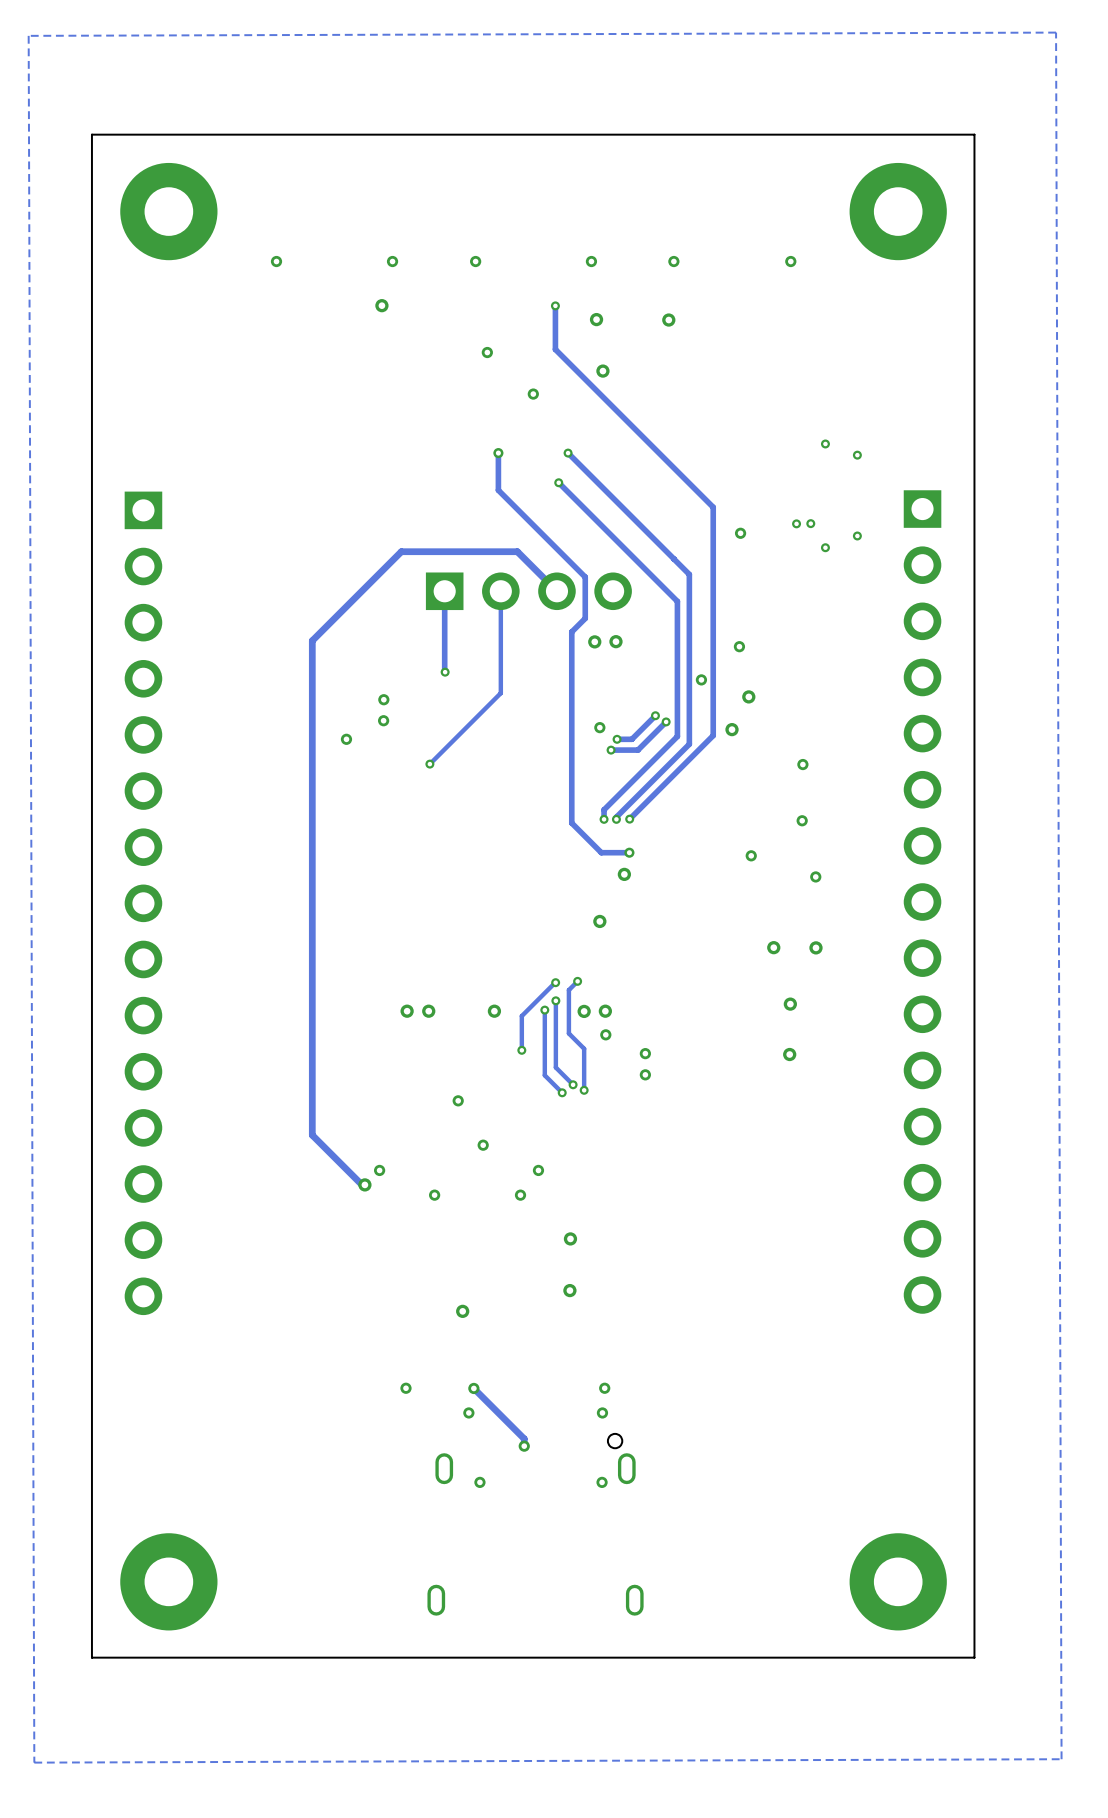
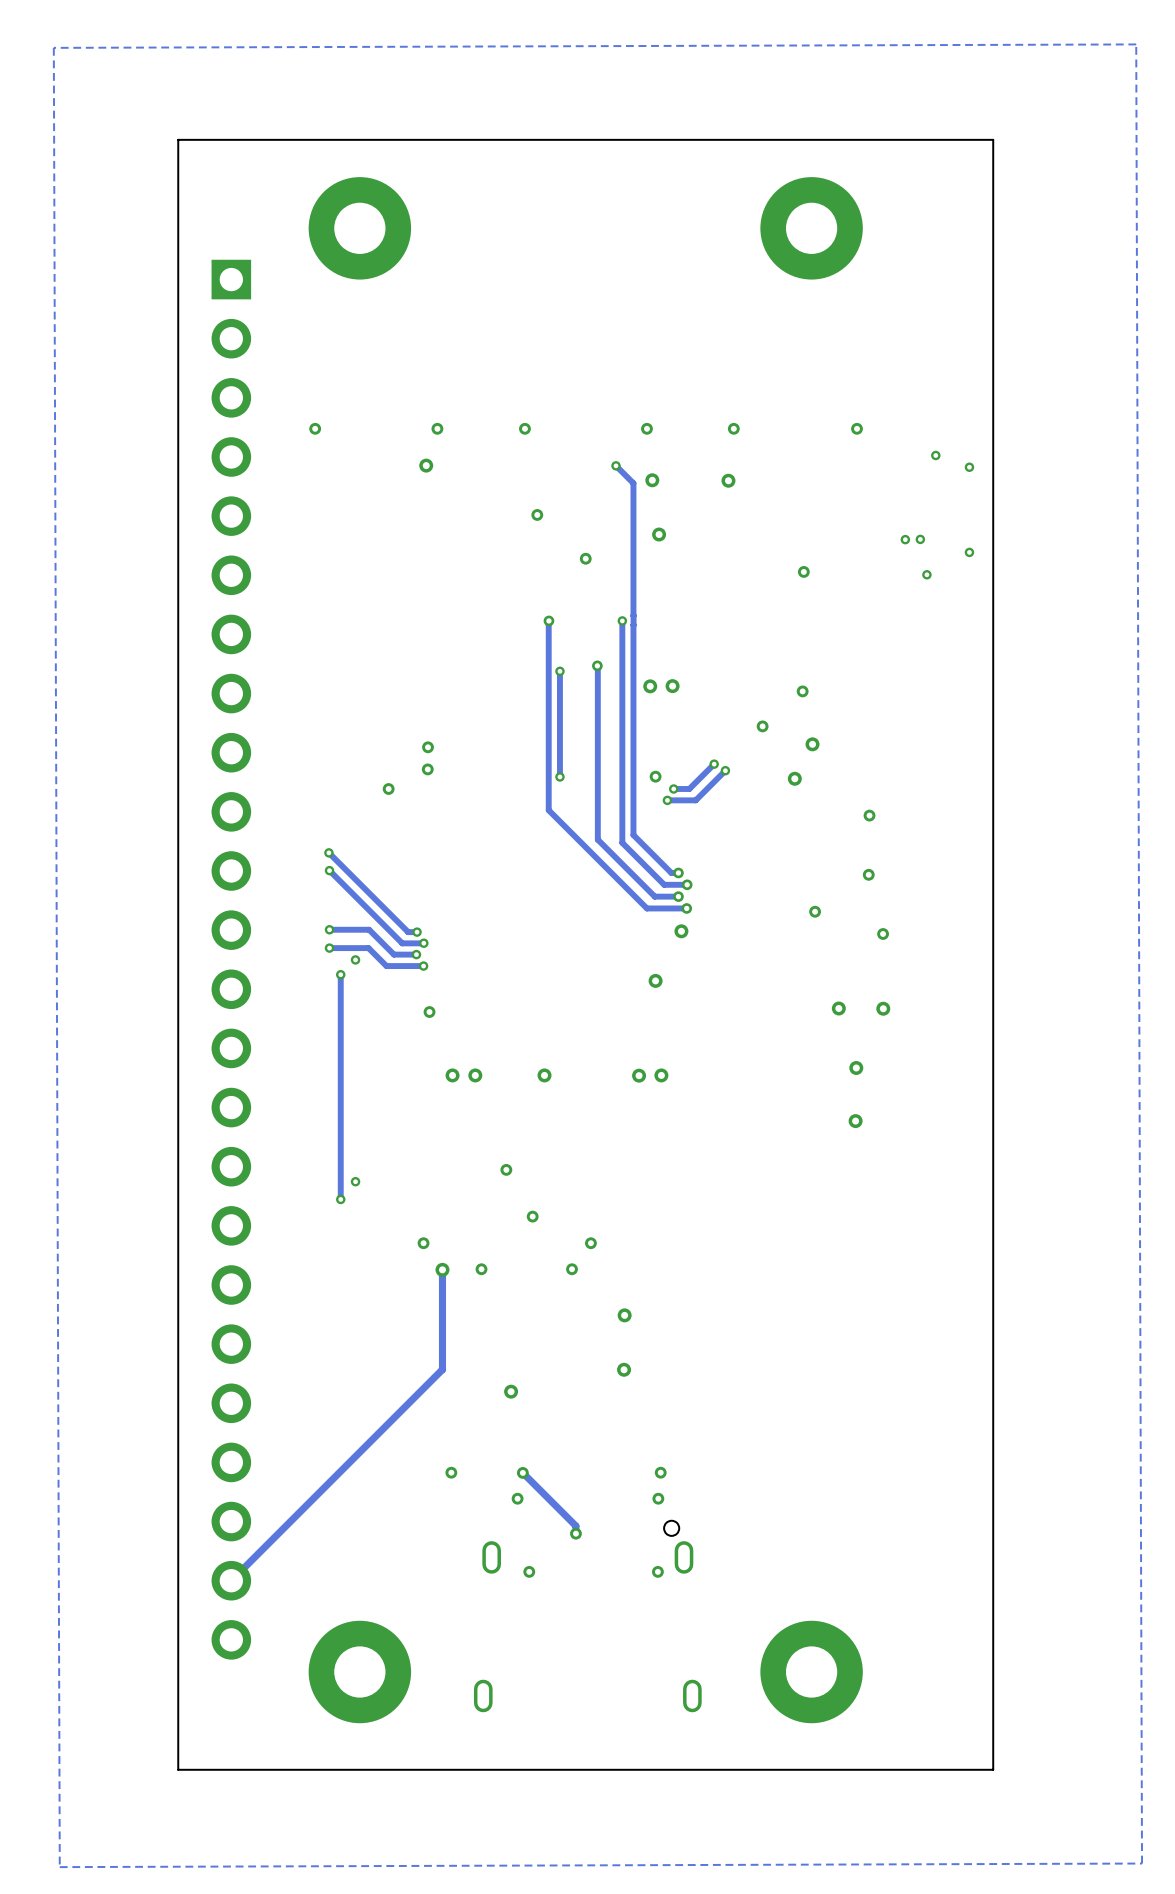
board edge: (974, 134) (91, 134) (91, 1657) (974, 1657) (974, 134) -> (993, 139) (993, 1769) (178, 1769) (178, 139) (993, 139)
part position: (168, 211) -> (359, 228)
part position: (898, 211) -> (811, 228)
via: (276, 261) -> none
via: (392, 261) -> none
via: (475, 261) -> none
via: (591, 261) -> none
via: (673, 261) -> none
via: (790, 261) -> none
via: (381, 305) -> none
track: (555, 305) (555, 349) (713, 507) (713, 735) (628, 819) -> none
via: (555, 305) -> none
via: (596, 319) -> none
via: (668, 320) -> none
via: (487, 352) -> none
via: (602, 371) -> none
via: (533, 394) -> none
via: none -> (315, 428)
via: none -> (437, 428)
via: none -> (524, 428)
via: none -> (646, 428)
via: none -> (733, 428)
via: none -> (857, 428)
via: none -> (935, 455)
via: none -> (426, 465)
track: none -> (616, 465) (633, 483) (633, 835) (671, 872) (678, 872)
via: none -> (969, 467)
via: (825, 443) -> none
via: none -> (652, 480)
via: none -> (728, 480)
track: (498, 453) (498, 490) (585, 577) (585, 618) (571, 631) (571, 823) (601, 852) -> (548, 621) (548, 810) (646, 908) (657, 908)
via: (498, 453) -> none
track: (568, 453) (689, 574) (689, 744) (616, 817) (616, 819) -> none
via position: (568, 453) -> (616, 465)
via: (857, 455) -> none
via: none -> (537, 514)
track: (558, 482) (677, 601) (677, 736) (604, 809) (604, 819) -> none
via: (558, 482) -> none
via: none -> (659, 534)
via: none -> (905, 539)
via: none -> (920, 539)
via: none -> (969, 552)
via: none -> (585, 558)
via: (796, 523) -> none
via: (810, 523) -> none
via: (825, 547) -> none
via: none -> (548, 620)
track: none -> (622, 621) (622, 842) (664, 884) (687, 884)
via: none -> (622, 620)
track: (444, 591) (445, 672) -> none
track: (500, 591) (500, 693) (429, 764) -> none
part: (528, 591) -> none
track: (556, 591) (517, 551) (401, 551) (312, 640) (312, 1135) (362, 1184) (364, 1184) -> none
track: none -> (597, 665) (597, 839) (654, 896) (678, 896)
via: none -> (597, 665)
track: none -> (559, 671) (559, 776)
via: none -> (559, 671)
via: (445, 672) -> none
via: none -> (559, 776)
via: (429, 764) -> none
track: none -> (328, 852) (408, 932) (417, 932)
via: none -> (328, 852)
track: none -> (329, 870) (402, 943) (423, 943)
via: none -> (329, 870)
via: (604, 819) -> none
via: (616, 819) -> none
via: none -> (678, 872)
via: (629, 819) -> none
via: none -> (687, 884)
via: none -> (678, 896)
track: none -> (329, 929) (369, 929) (393, 954) (416, 954)
via: none -> (329, 929)
via: none -> (417, 932)
via: none -> (423, 943)
track: none -> (329, 948) (368, 948) (386, 966) (423, 966)
via: none -> (329, 948)
via: none -> (416, 954)
part: none -> (231, 959)
via: none -> (355, 959)
part: (922, 902) -> none
part: (143, 903) -> none
via: none -> (423, 966)
track: none -> (340, 974) (340, 1199)
via: none -> (340, 974)
via: none -> (429, 1012)
track: (577, 981) (568, 990) (568, 1033) (584, 1048) (584, 1090) -> none
via: (577, 981) -> none
track: (555, 982) (521, 1016) (521, 1050) -> none
via: (555, 982) -> none
track: (555, 1000) (555, 1067) (573, 1084) -> none
via: (555, 1000) -> none
track: (544, 1010) (544, 1075) (562, 1092) -> none
via: (544, 1010) -> none
via: (605, 1034) -> none
via: (521, 1050) -> none
via: (645, 1053) -> none
via: (645, 1074) -> none
via: (573, 1084) -> none
via: (584, 1090) -> none
via: (562, 1092) -> none
via: none -> (355, 1181)
via: none -> (340, 1199)
via position: (364, 1184) -> (442, 1269)
track: none -> (442, 1269) (442, 1369) (231, 1580)
part position: (168, 1581) -> (359, 1672)
part position: (898, 1581) -> (811, 1672)

